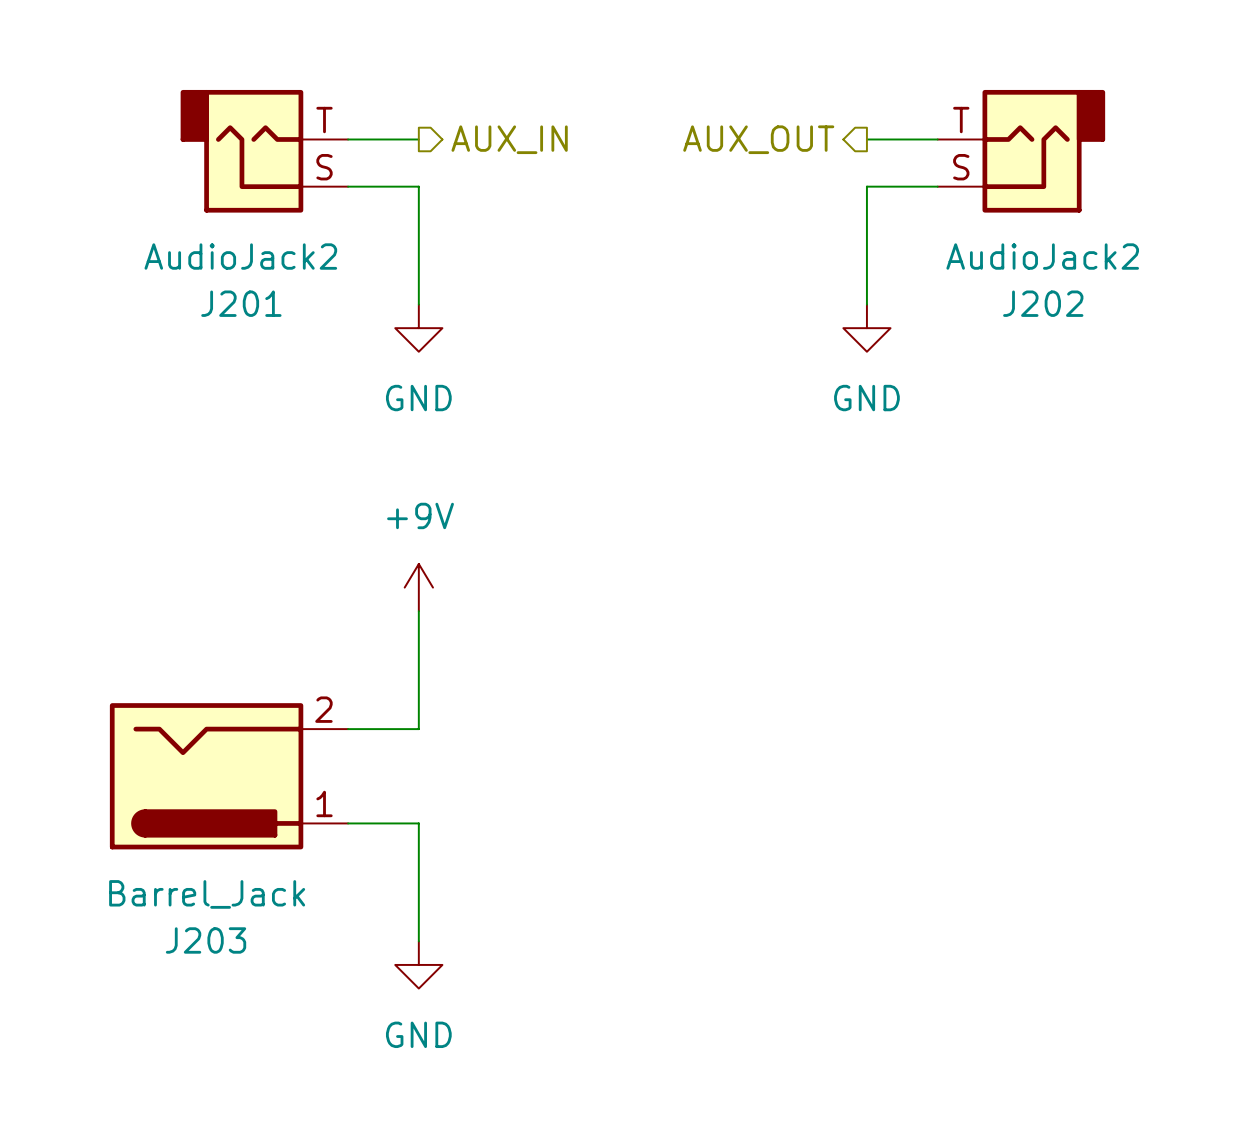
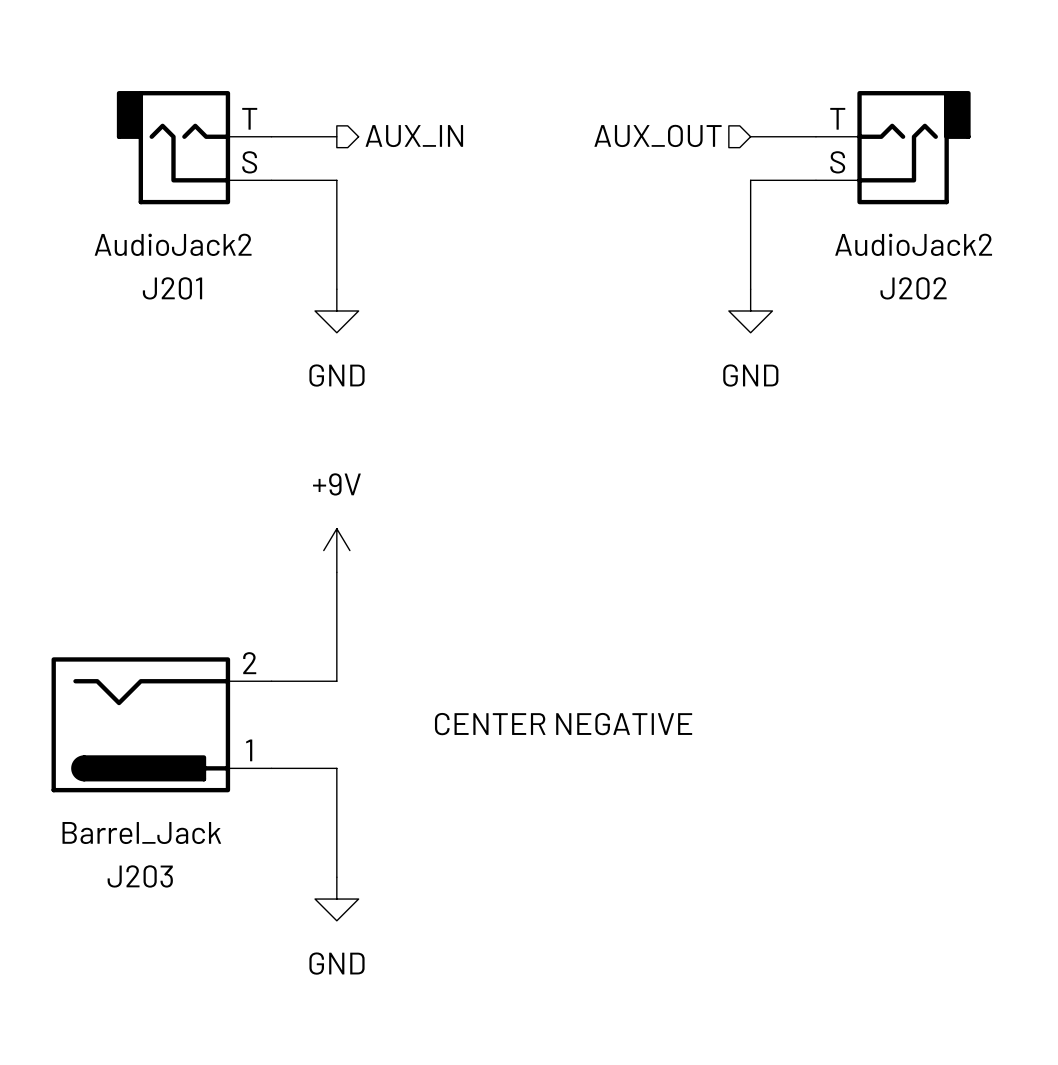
hierarchical label shape: output (758, 139) -> input (658, 135)
text: none -> CENTER NEGATIVE (563, 724)

